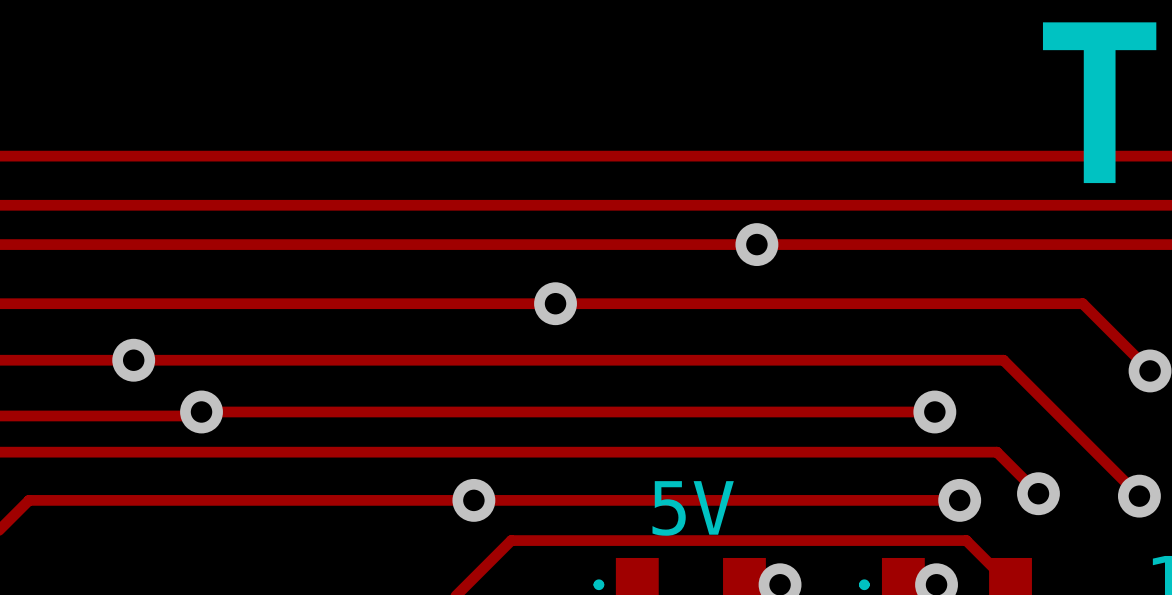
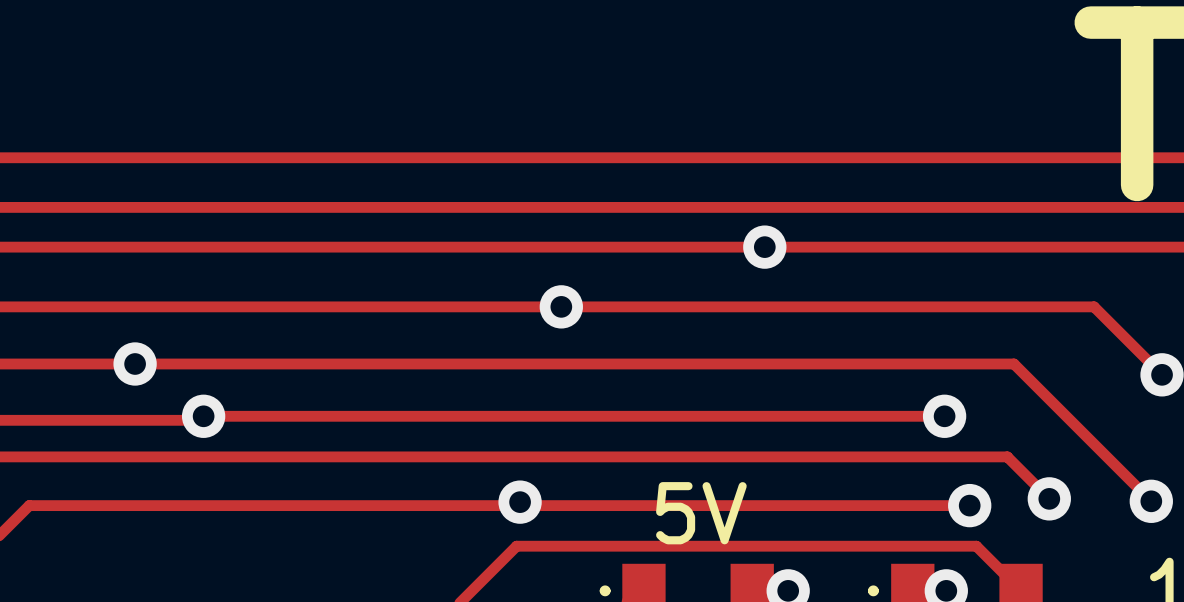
via position: (473, 500) -> (520, 502)

